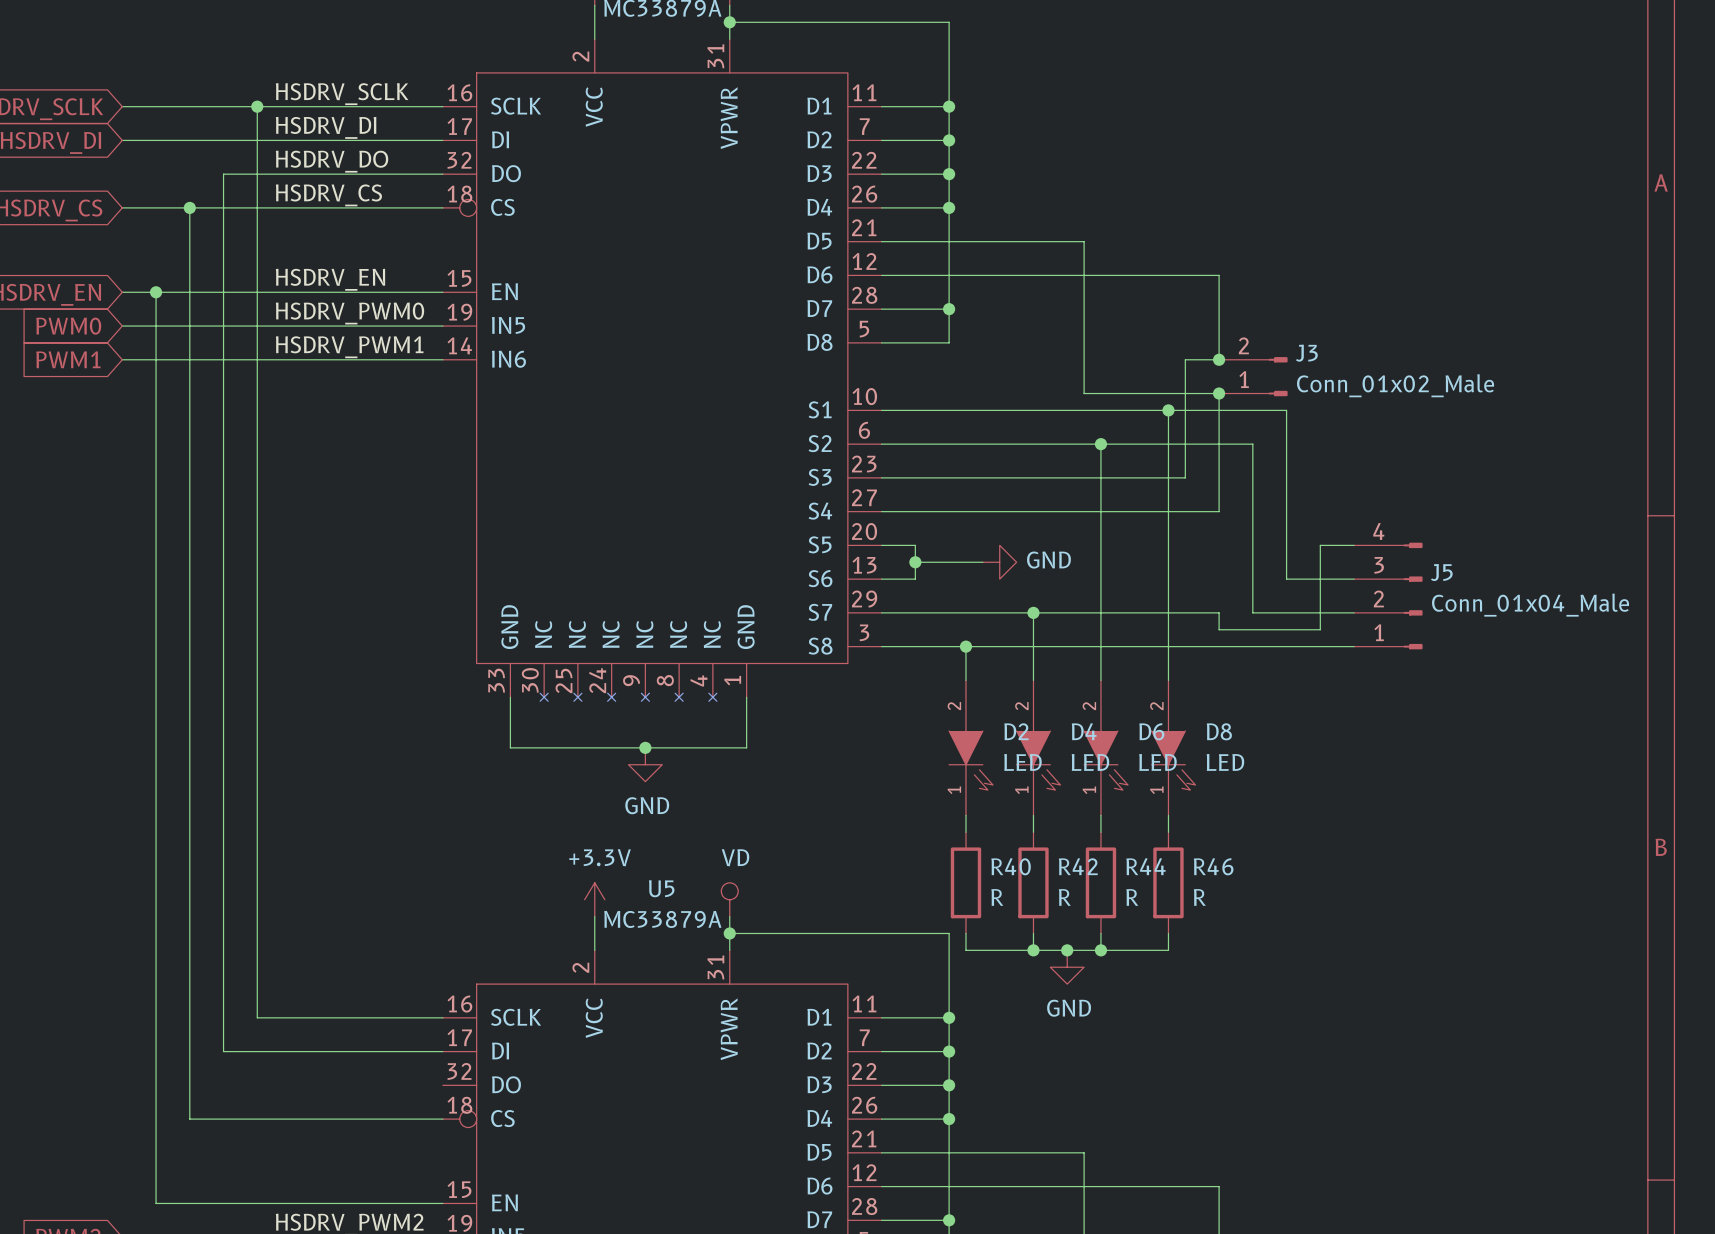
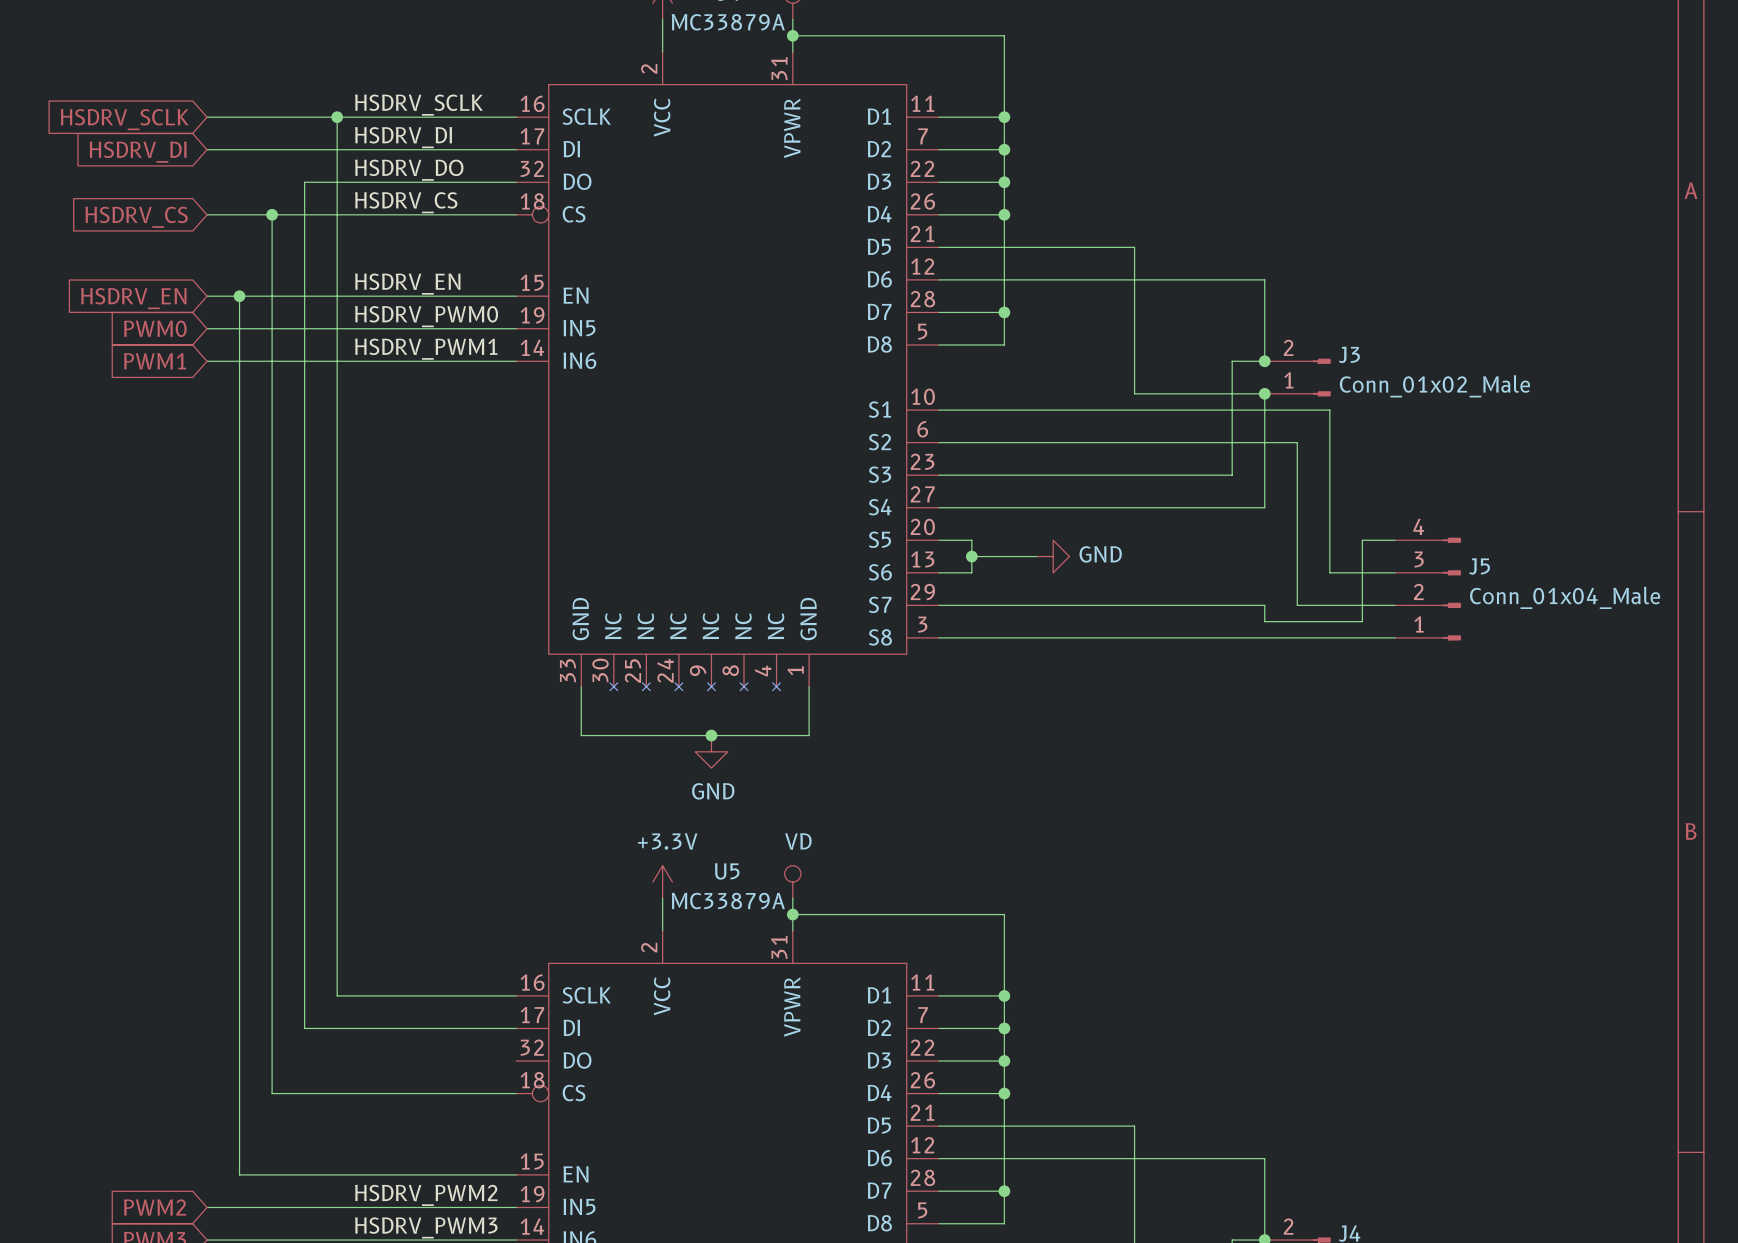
wire: (1168, 410) (1168, 680) -> none
junction: (1168, 410) -> none
wire: (1100, 444) (1100, 680) -> none
junction: (1100, 444) -> none
wire: (1033, 612) (1033, 680) -> none
junction: (1033, 612) -> none
wire: (965, 646) (965, 680) -> none
junction: (965, 646) -> none
D2: LED (971, 747) -> none
D4: LED (1038, 747) -> none
D6: LED (1106, 747) -> none
D8: LED (1173, 747) -> none
wire: (965, 815) (965, 832) -> none
wire: (1033, 815) (1033, 832) -> none
wire: (1100, 815) (1100, 832) -> none
wire: (1168, 815) (1168, 832) -> none
R40: R (965, 882) -> none
R42: R (1033, 882) -> none
R44: R (1100, 882) -> none
R46: R (1168, 882) -> none
wire: (965, 933) (965, 950) (1168, 950) (1168, 933) -> none
wire: (1033, 933) (1033, 950) -> none
wire: (1100, 933) (1100, 950) -> none
junction: (1033, 950) -> none
junction: (1067, 950) -> none
junction: (1100, 950) -> none
power symbol: GND (1067, 967) -> none

